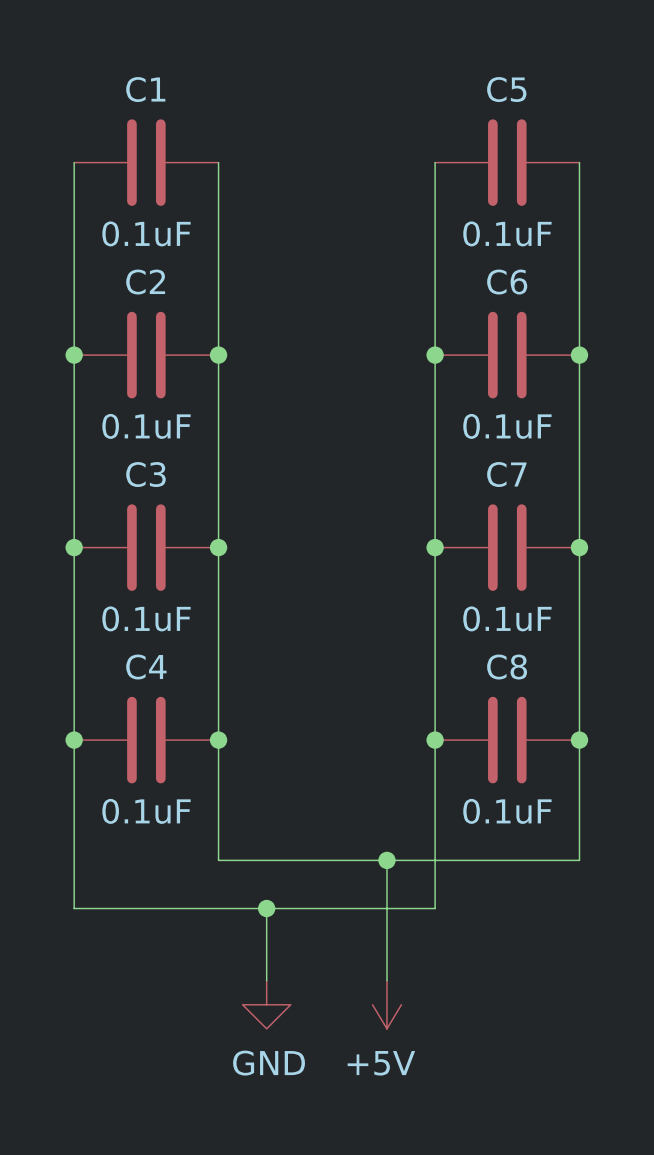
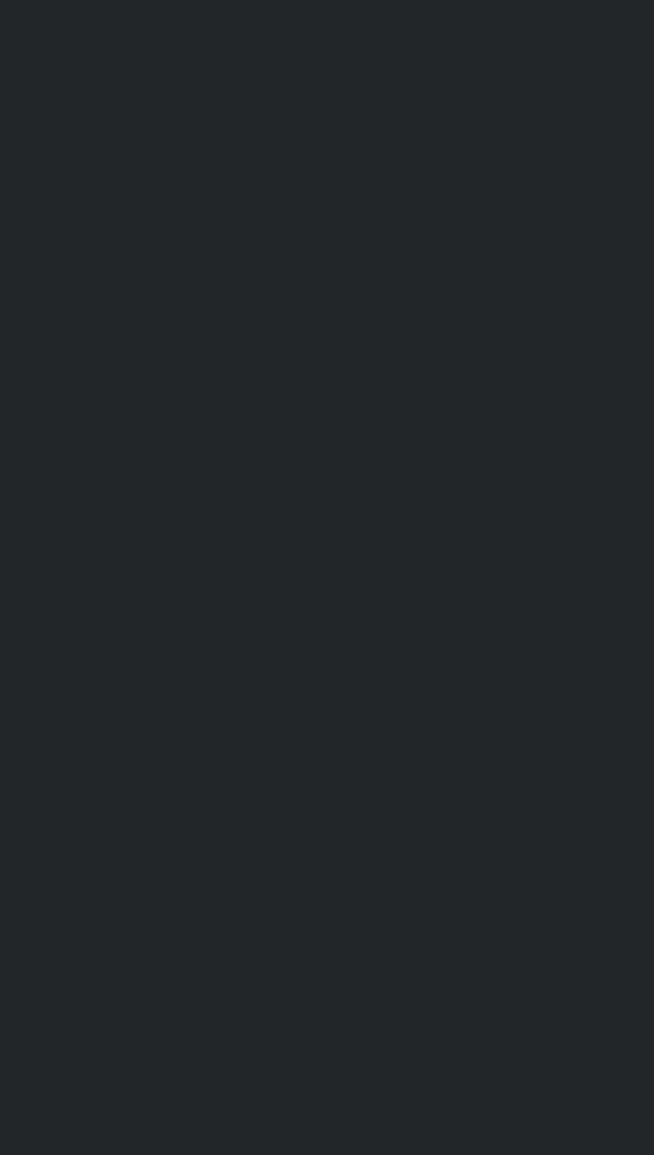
wire: (74, 162) (74, 908) (435, 908) (435, 162) -> none
C1: 0.1uF (146, 162) -> none
wire: (218, 162) (218, 860) (579, 860) (579, 162) -> none
C5: 0.1uF (507, 162) -> none
junction: (74, 355) -> none
C2: 0.1uF (146, 355) -> none
junction: (218, 355) -> none
junction: (435, 355) -> none
C6: 0.1uF (507, 355) -> none
junction: (579, 355) -> none
junction: (74, 547) -> none
C3: 0.1uF (146, 547) -> none
junction: (218, 547) -> none
junction: (435, 547) -> none
C7: 0.1uF (507, 547) -> none
junction: (579, 547) -> none
junction: (74, 740) -> none
C4: 0.1uF (146, 740) -> none
junction: (218, 740) -> none
junction: (435, 740) -> none
C8: 0.1uF (507, 740) -> none
junction: (579, 740) -> none
wire: (386, 860) (386, 980) -> none
junction: (386, 860) -> none
wire: (266, 908) (266, 980) -> none
junction: (266, 908) -> none
power symbol: GND (266, 1004) -> none
power symbol: +5V (386, 1004) -> none

